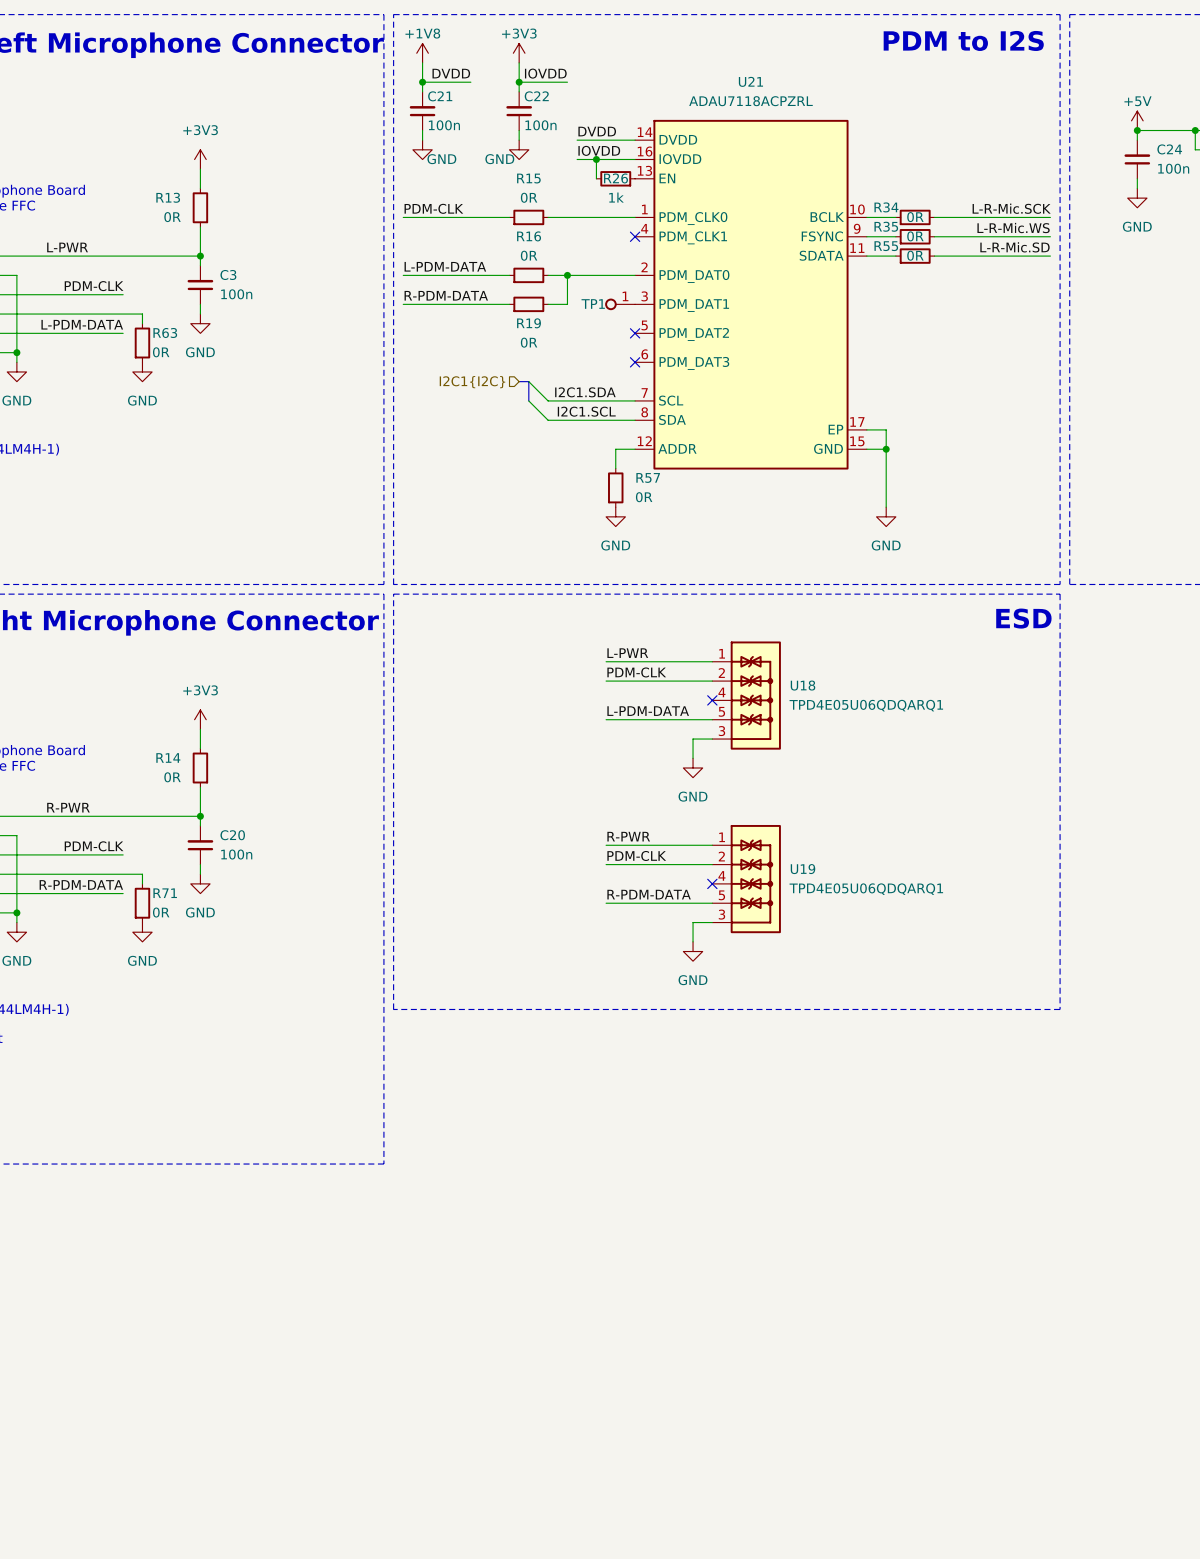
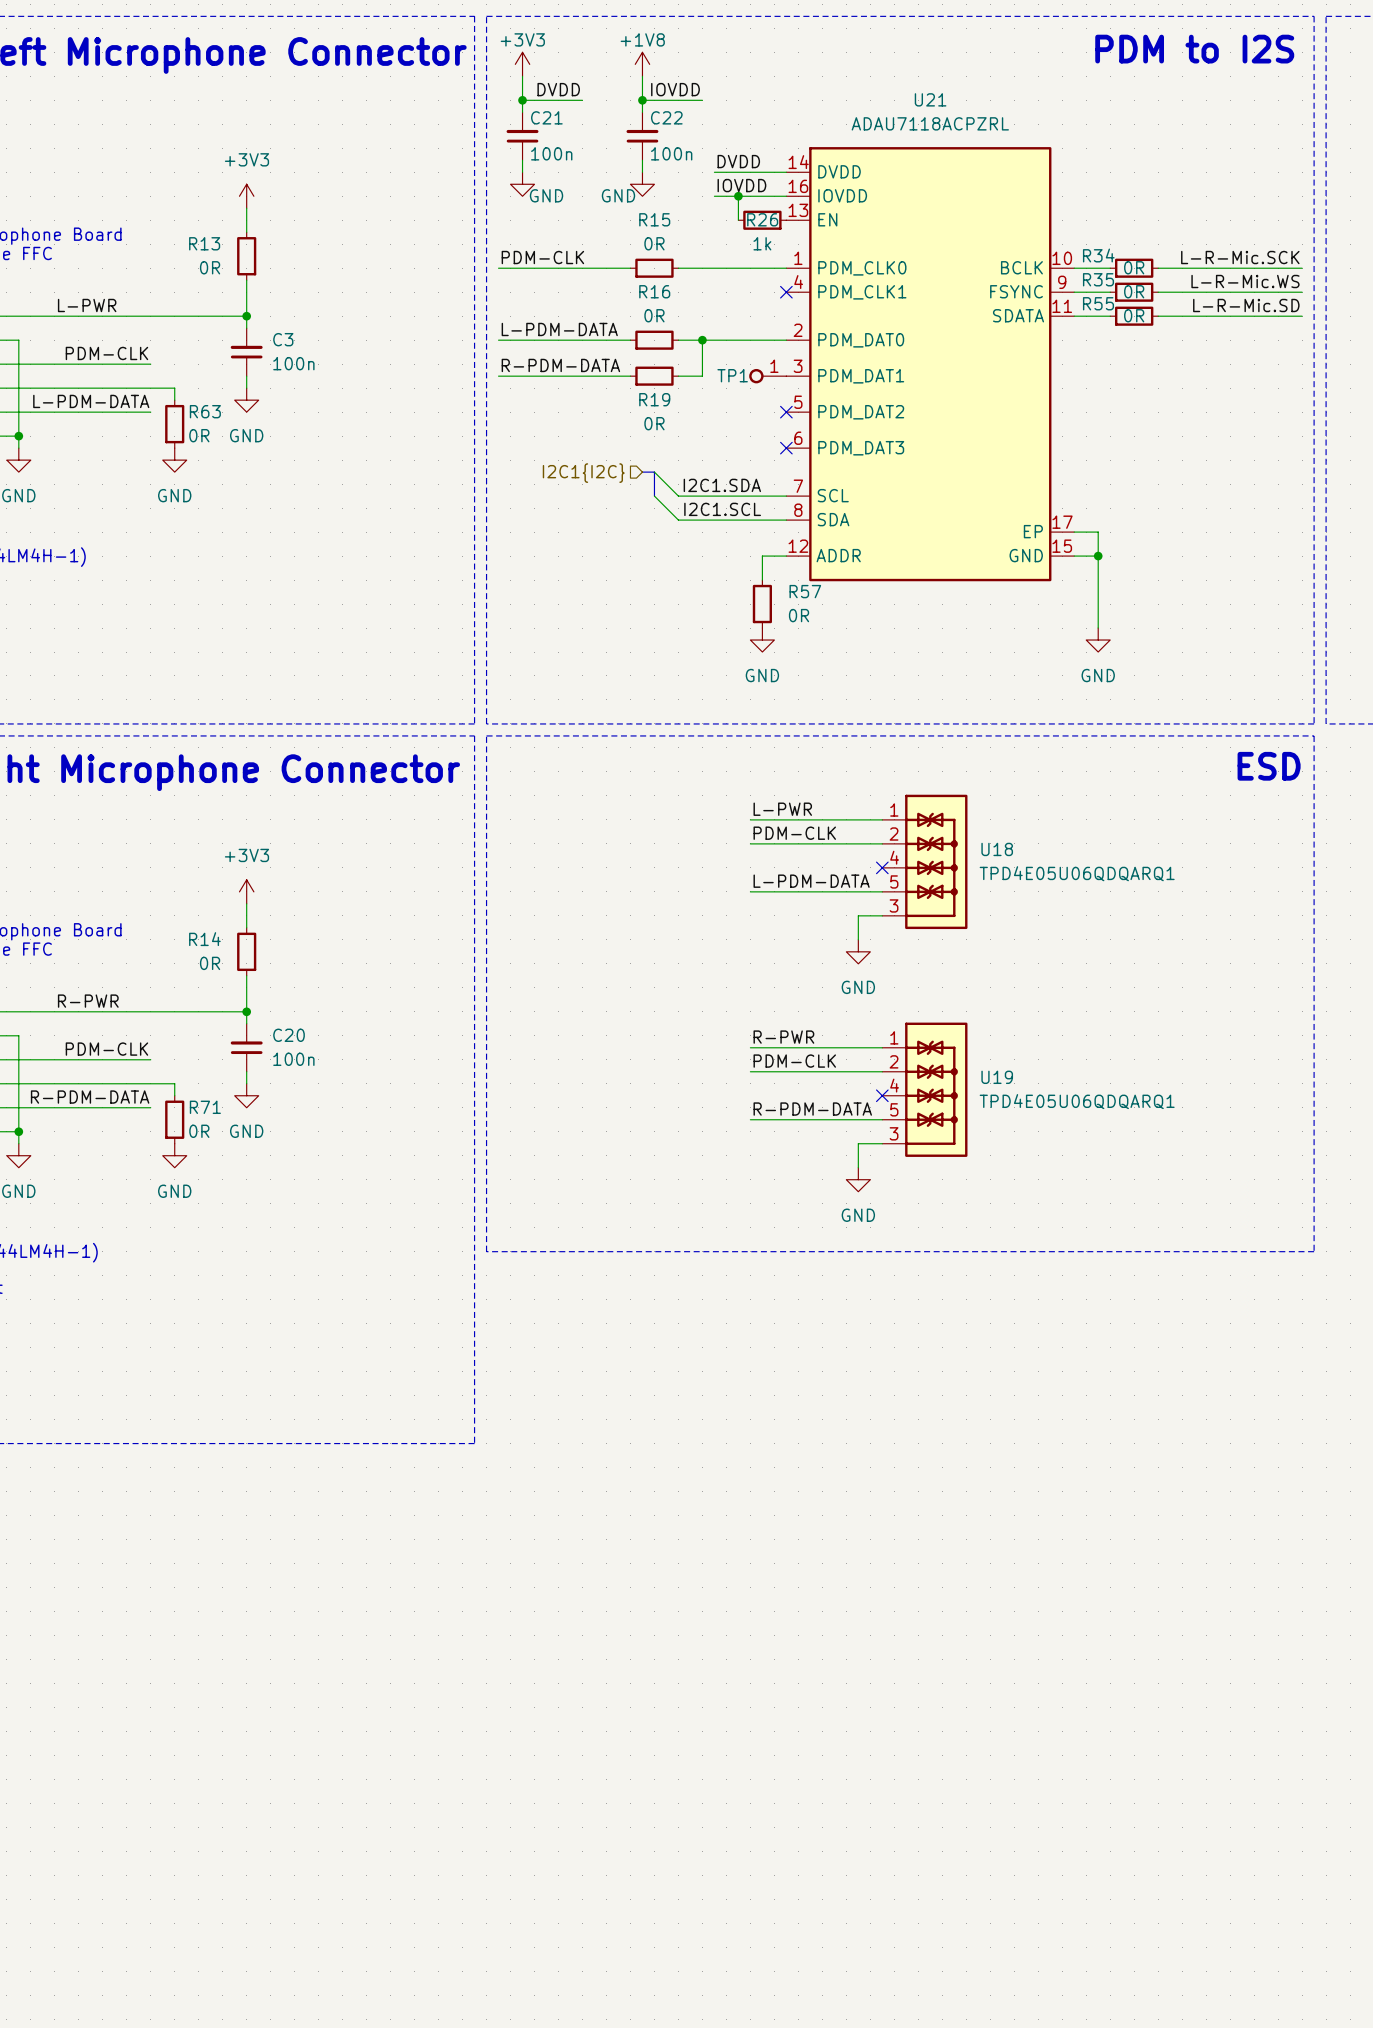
power symbol: +1V8 (422, 53) -> +3V3 (522, 64)
power symbol: +3V3 (519, 53) -> +1V8 (642, 64)

